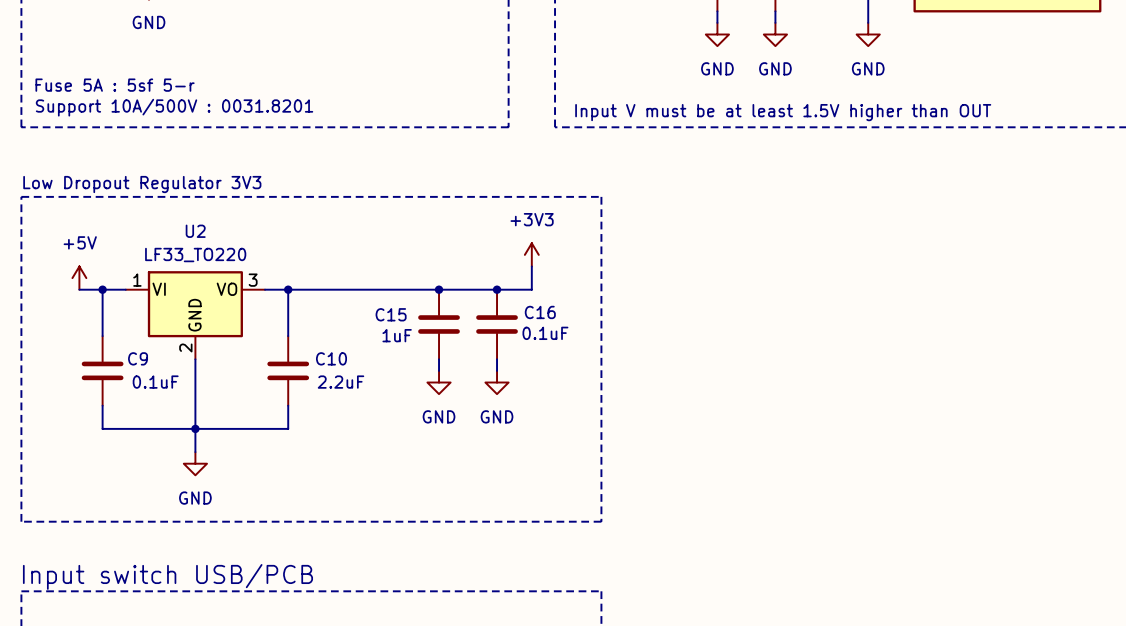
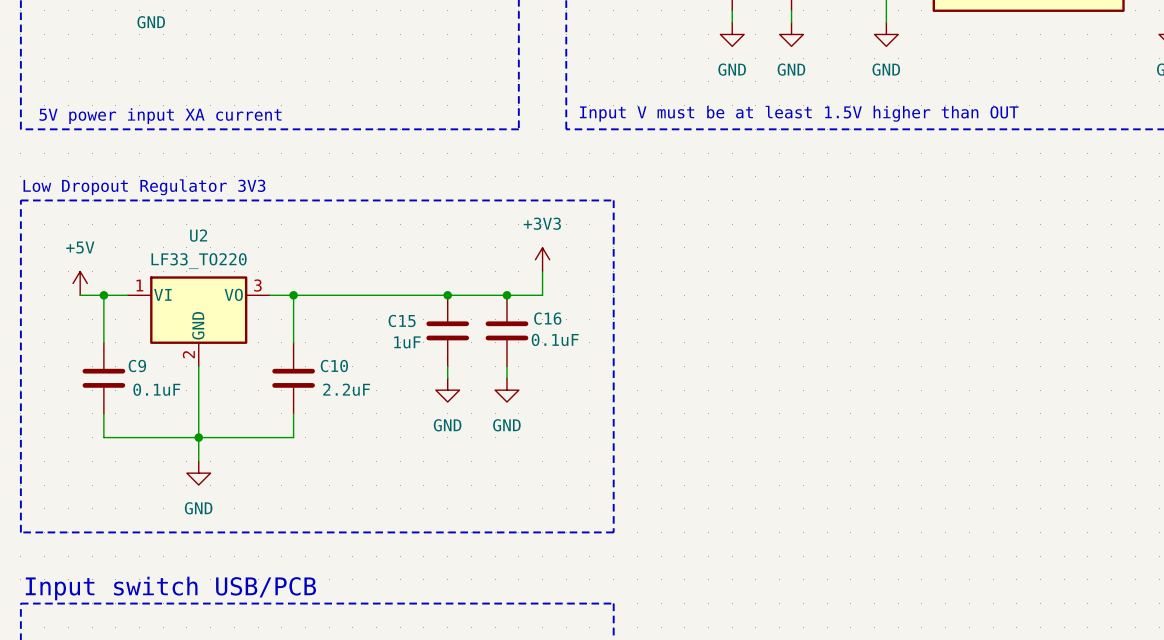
text: Fuse 5A : 5sf 5-r (115, 85) -> none
text: Support 10A/500V : 0031.8201 (174, 107) -> none
text: none -> 5V power input XA current (160, 116)

